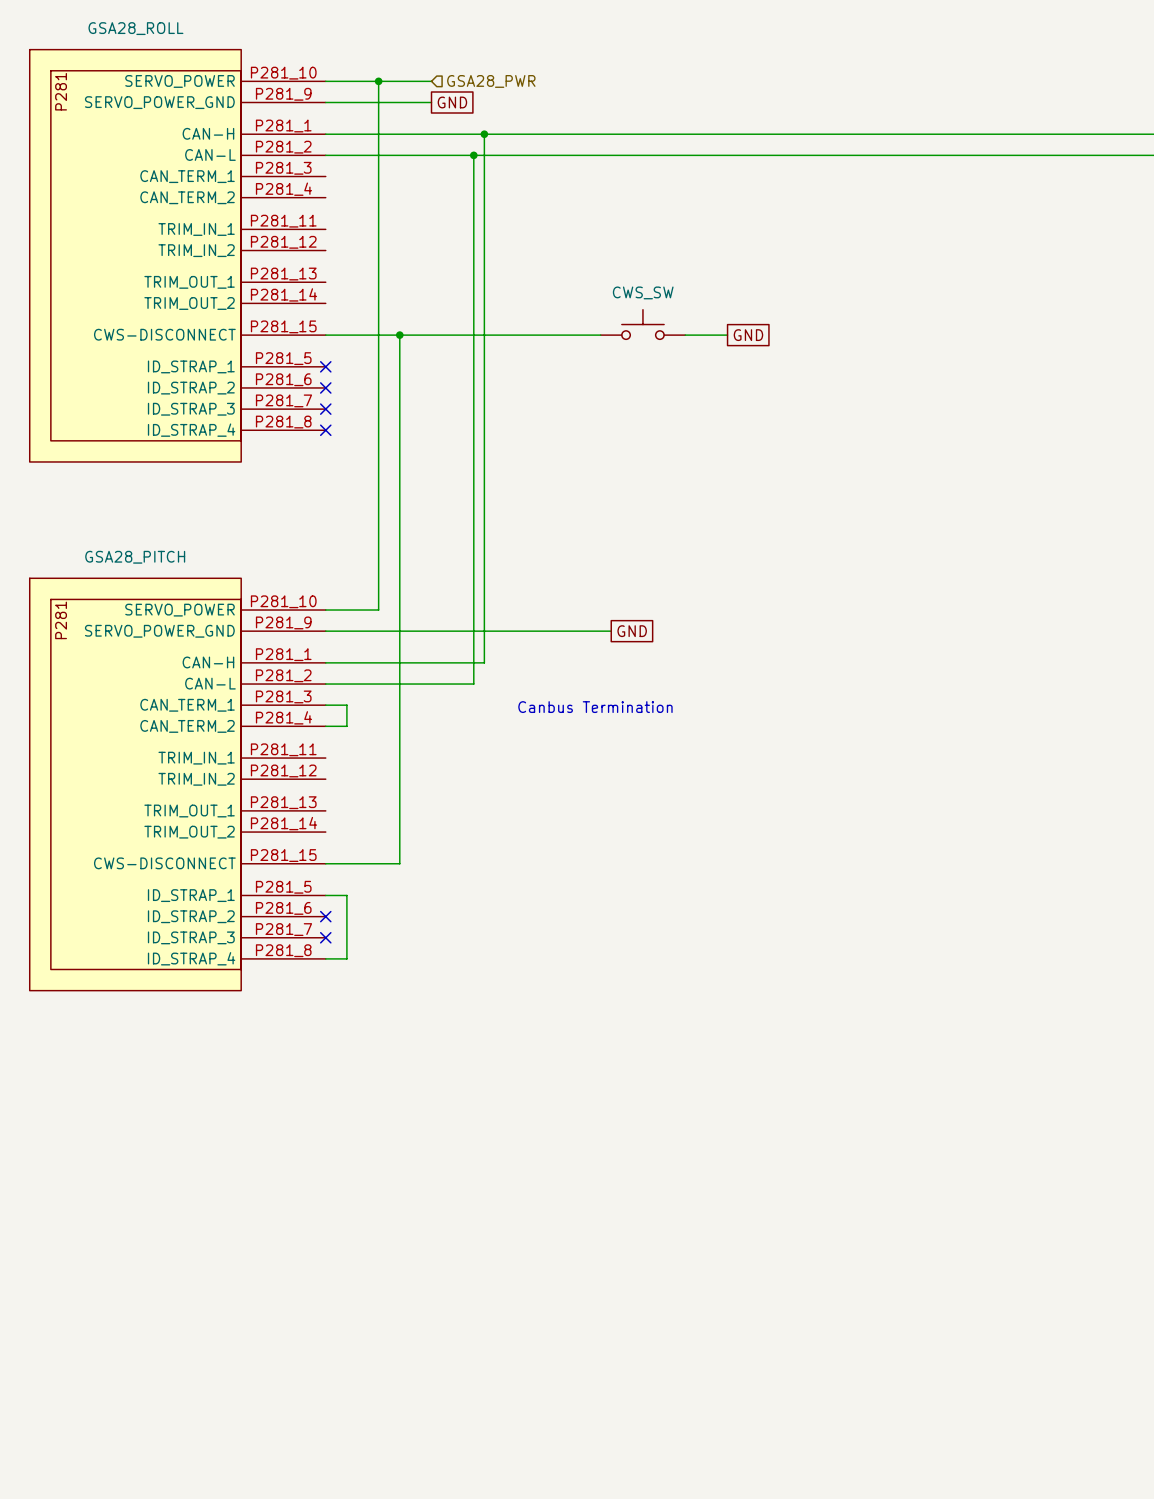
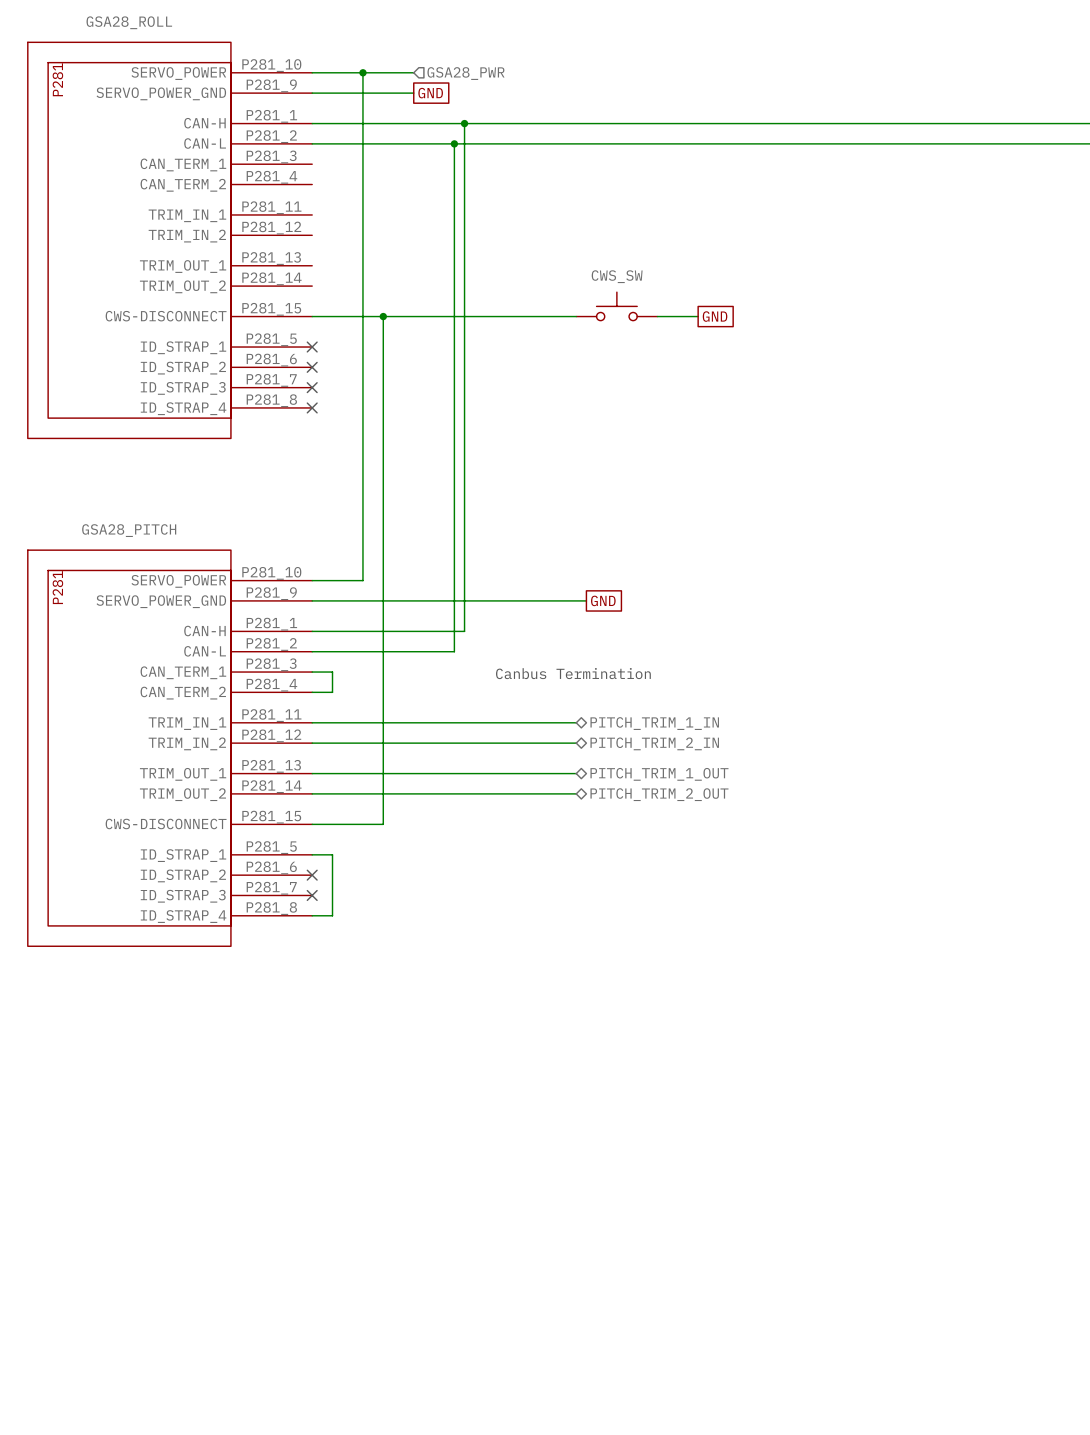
wire: none -> (312, 722) (576, 722)
hierarchical label: none -> PITCH_TRIM_1_IN (654, 723)
wire: none -> (312, 743) (576, 743)
hierarchical label: none -> PITCH_TRIM_2_IN (654, 743)
wire: none -> (312, 773) (576, 773)
hierarchical label: none -> PITCH_TRIM_1_OUT (659, 774)
wire: none -> (312, 793) (576, 793)
hierarchical label: none -> PITCH_TRIM_2_OUT (659, 794)

